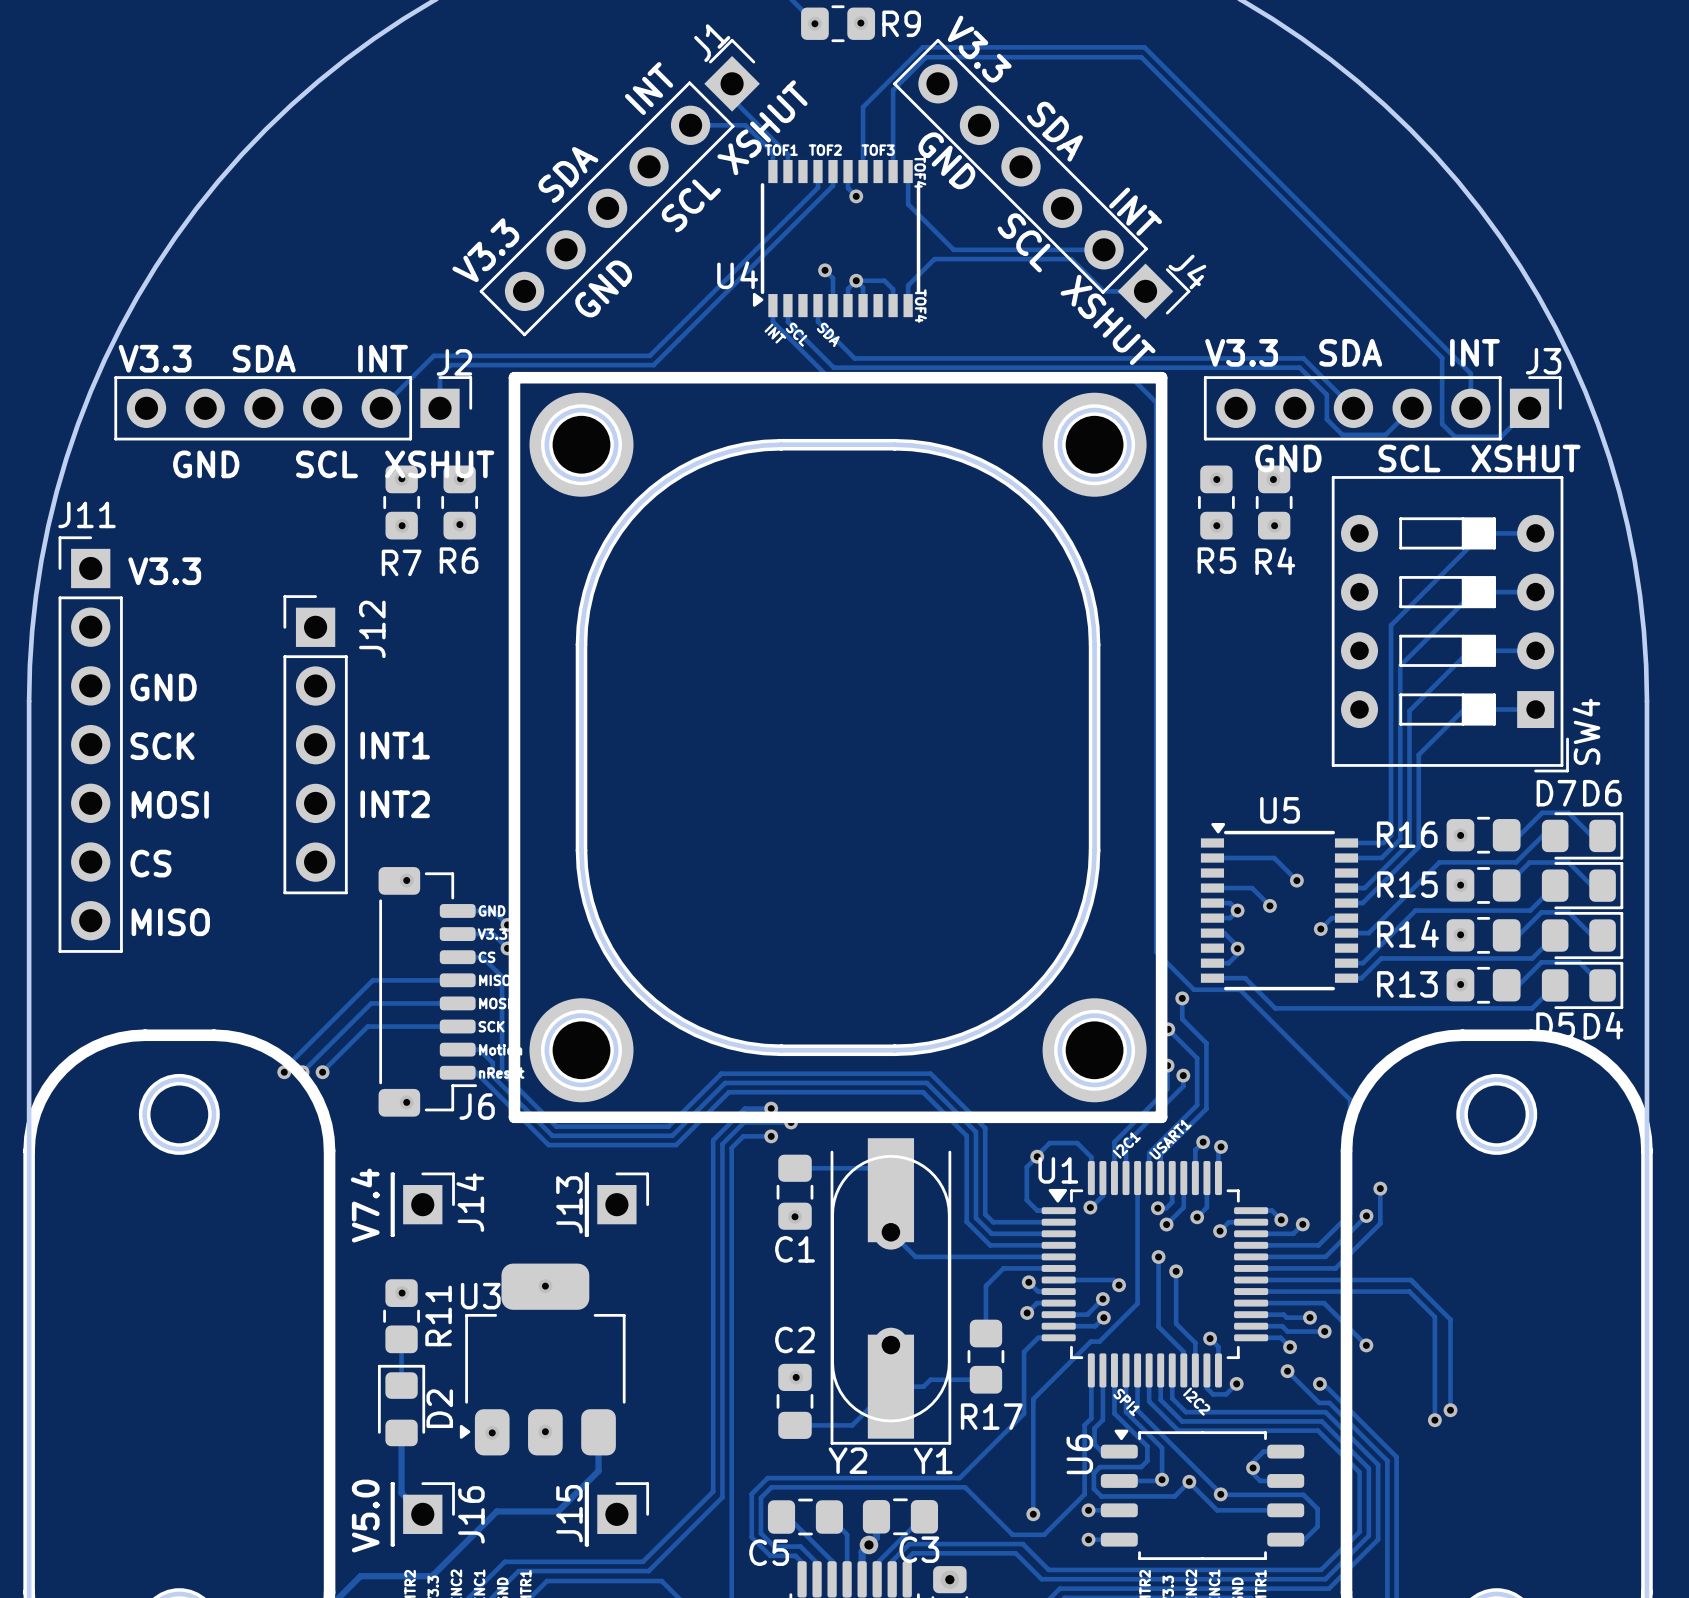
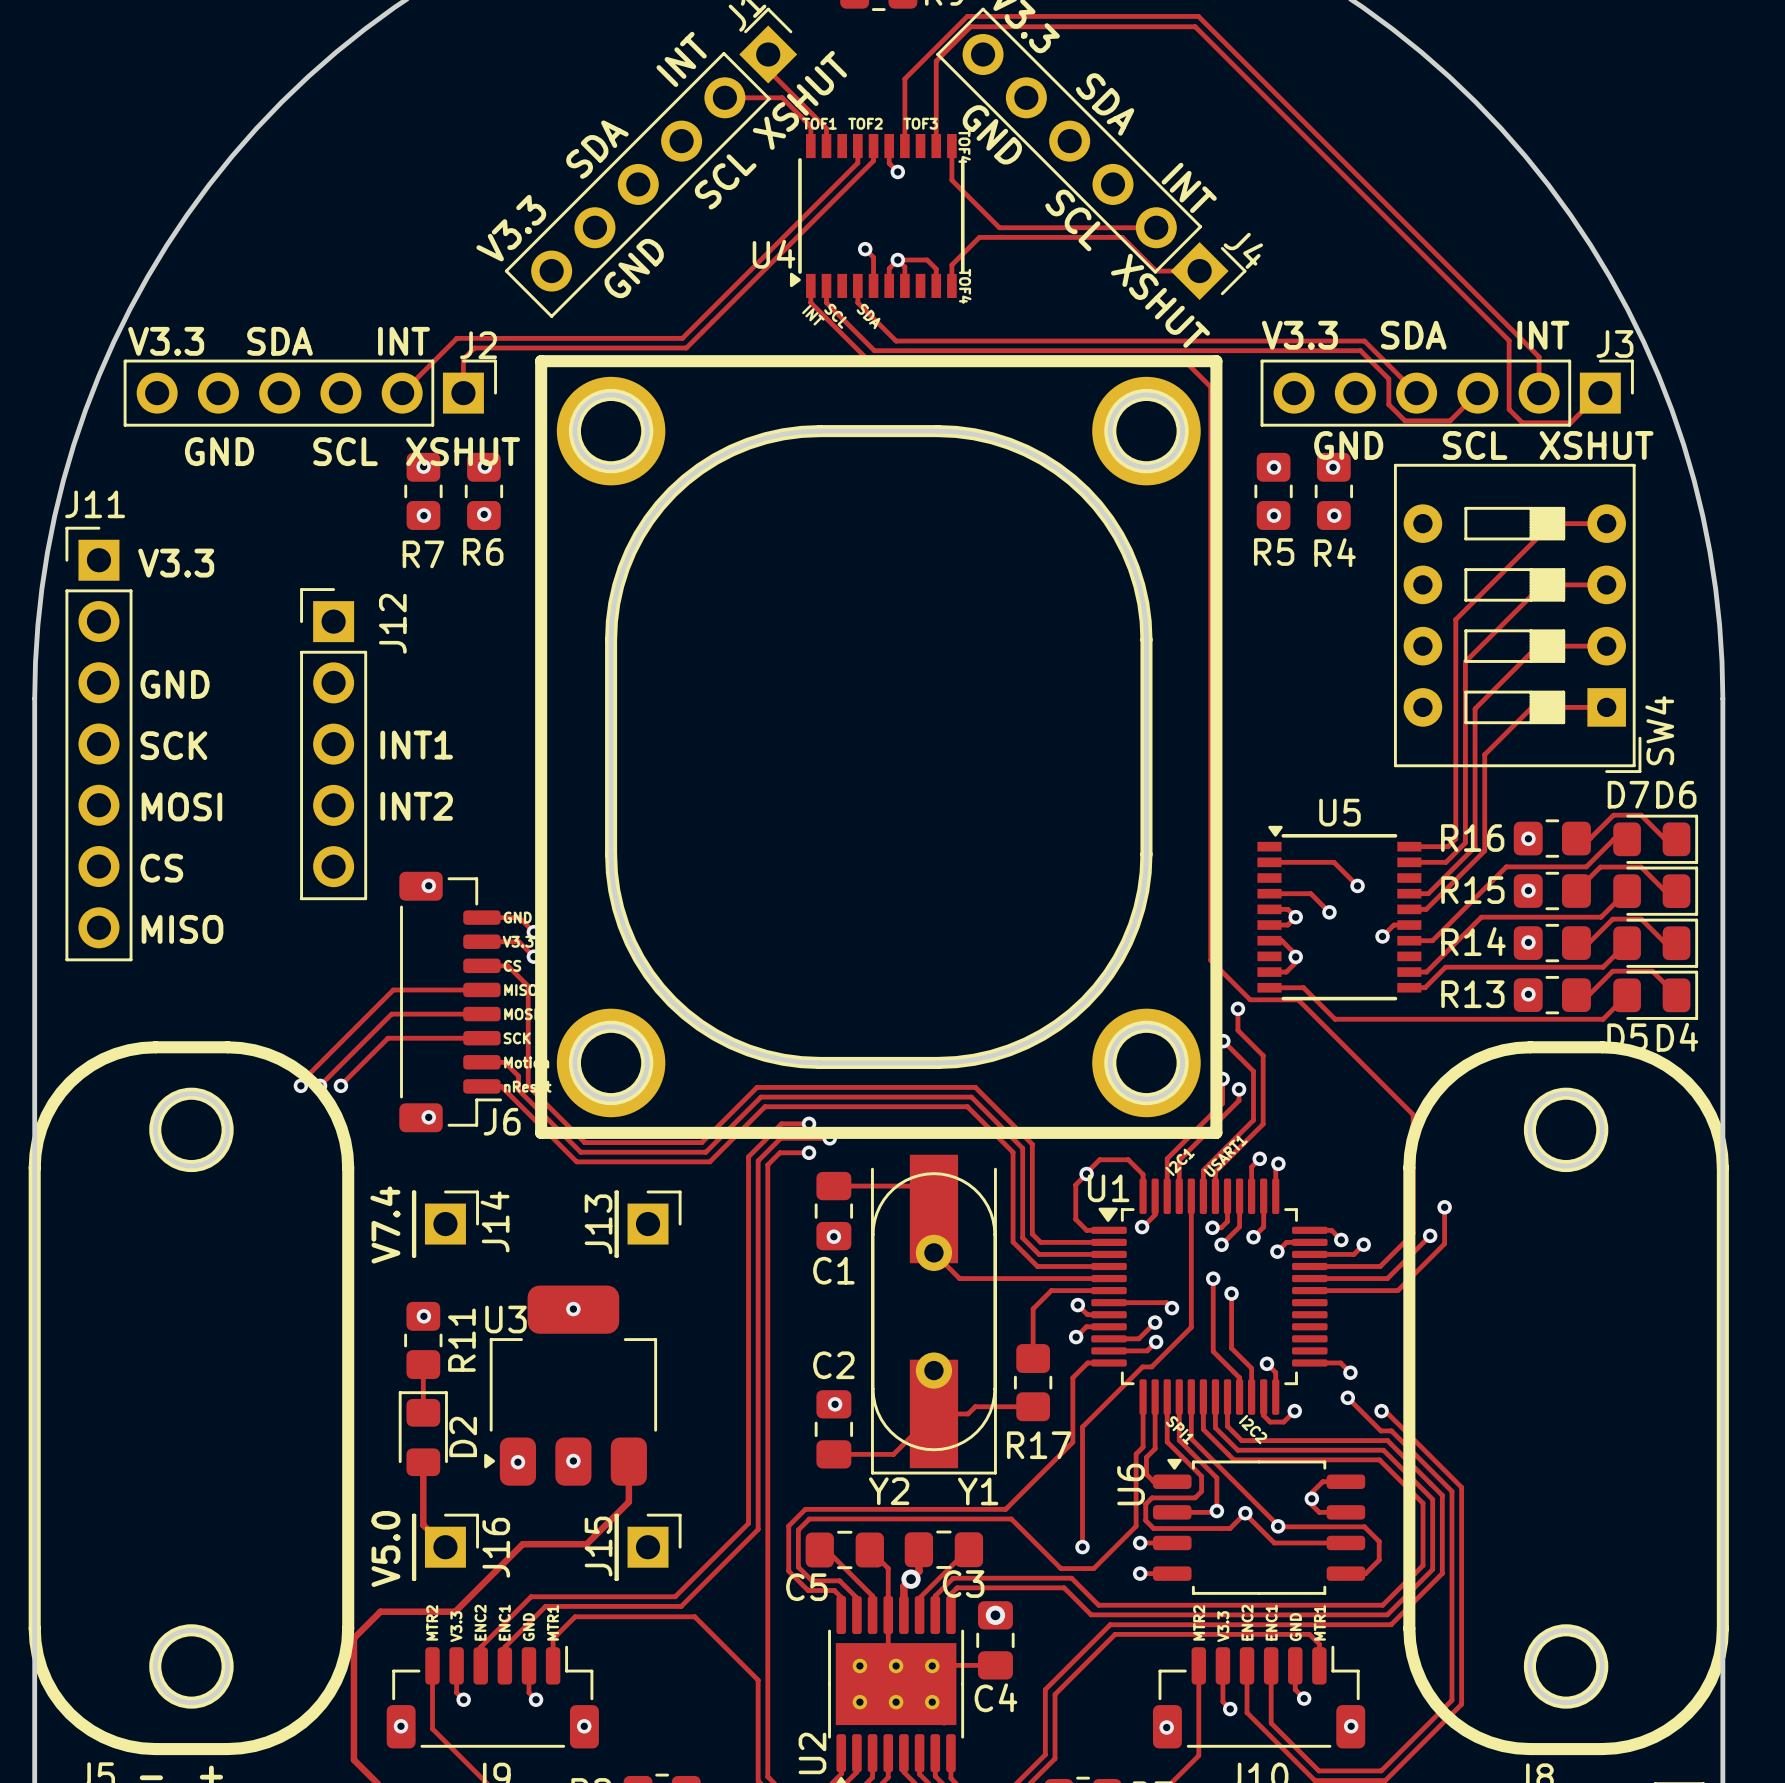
track: (1251, 1280) (1410, 1280) (1450, 1319) (1450, 1410) -> none
track: (1251, 1291) (1409, 1291) (1434, 1317) (1434, 1420) -> none
track: (1251, 1303) (1324, 1303) (1366, 1345) -> none
track: (1251, 1314) (1283, 1314) (1286, 1317) (1310, 1317) -> none
via: (1310, 1317) -> none
track: (1251, 1326) (1282, 1326) (1287, 1331) (1324, 1331) -> none
via: (1324, 1331) -> none
via: (1366, 1345) -> none
via: (1450, 1410) -> none
via: (1434, 1420) -> none

